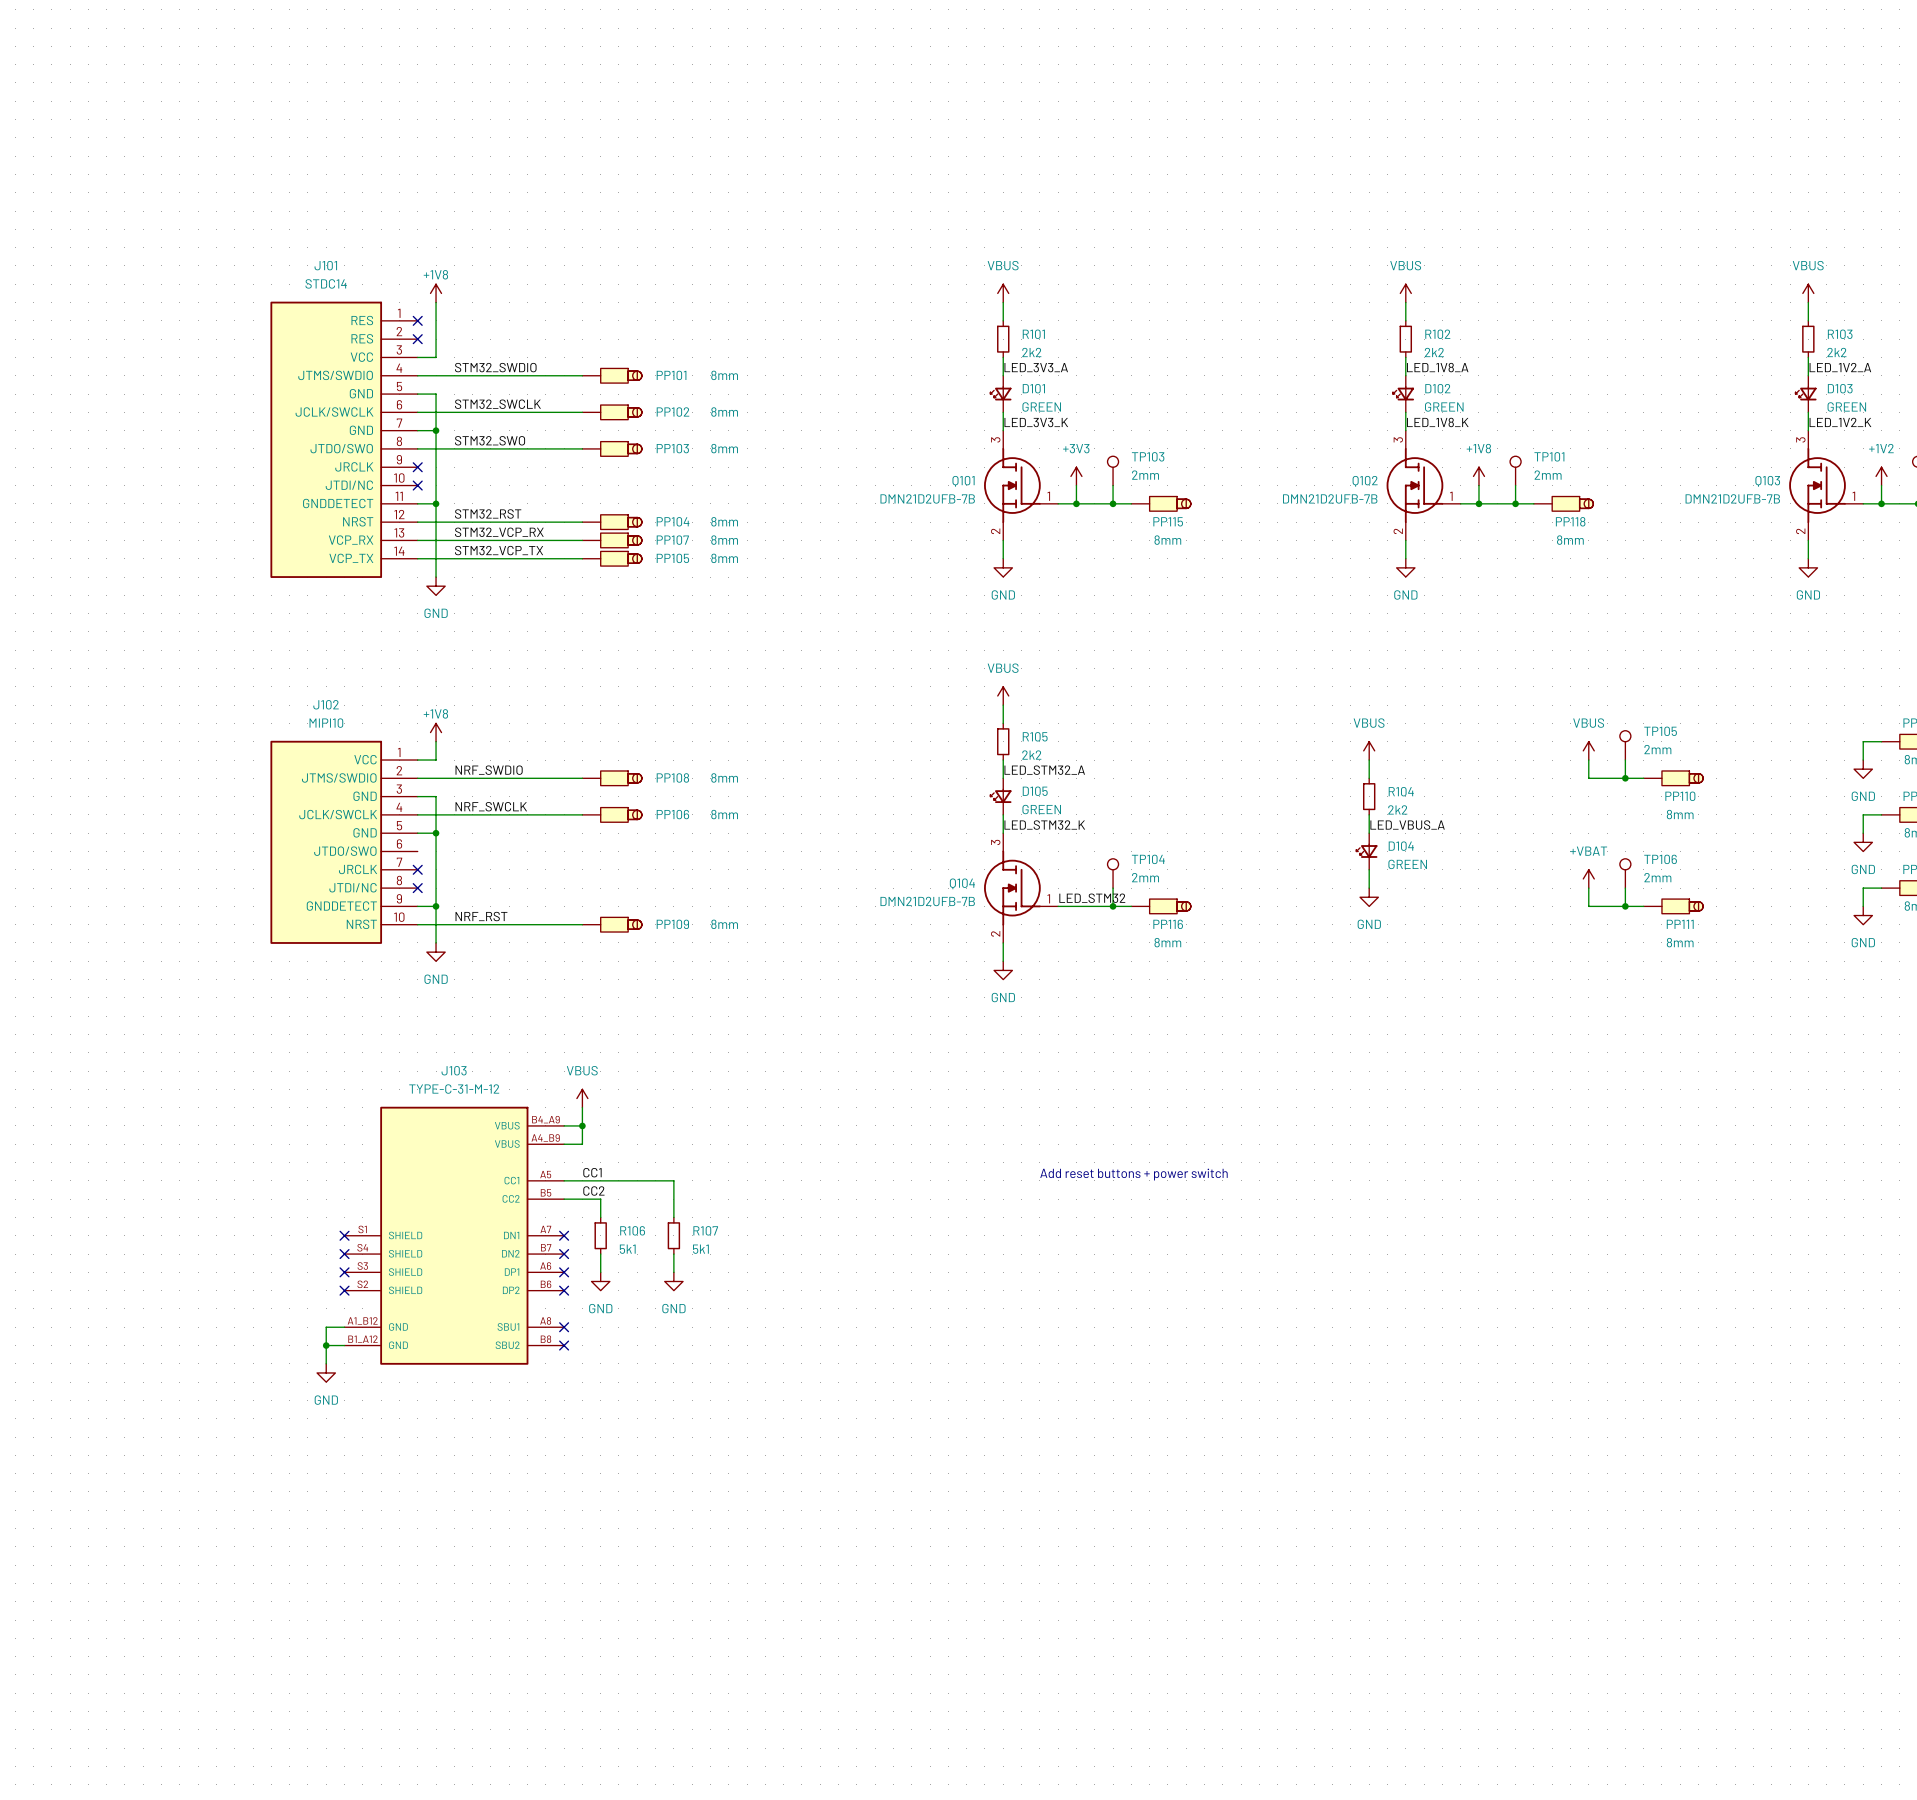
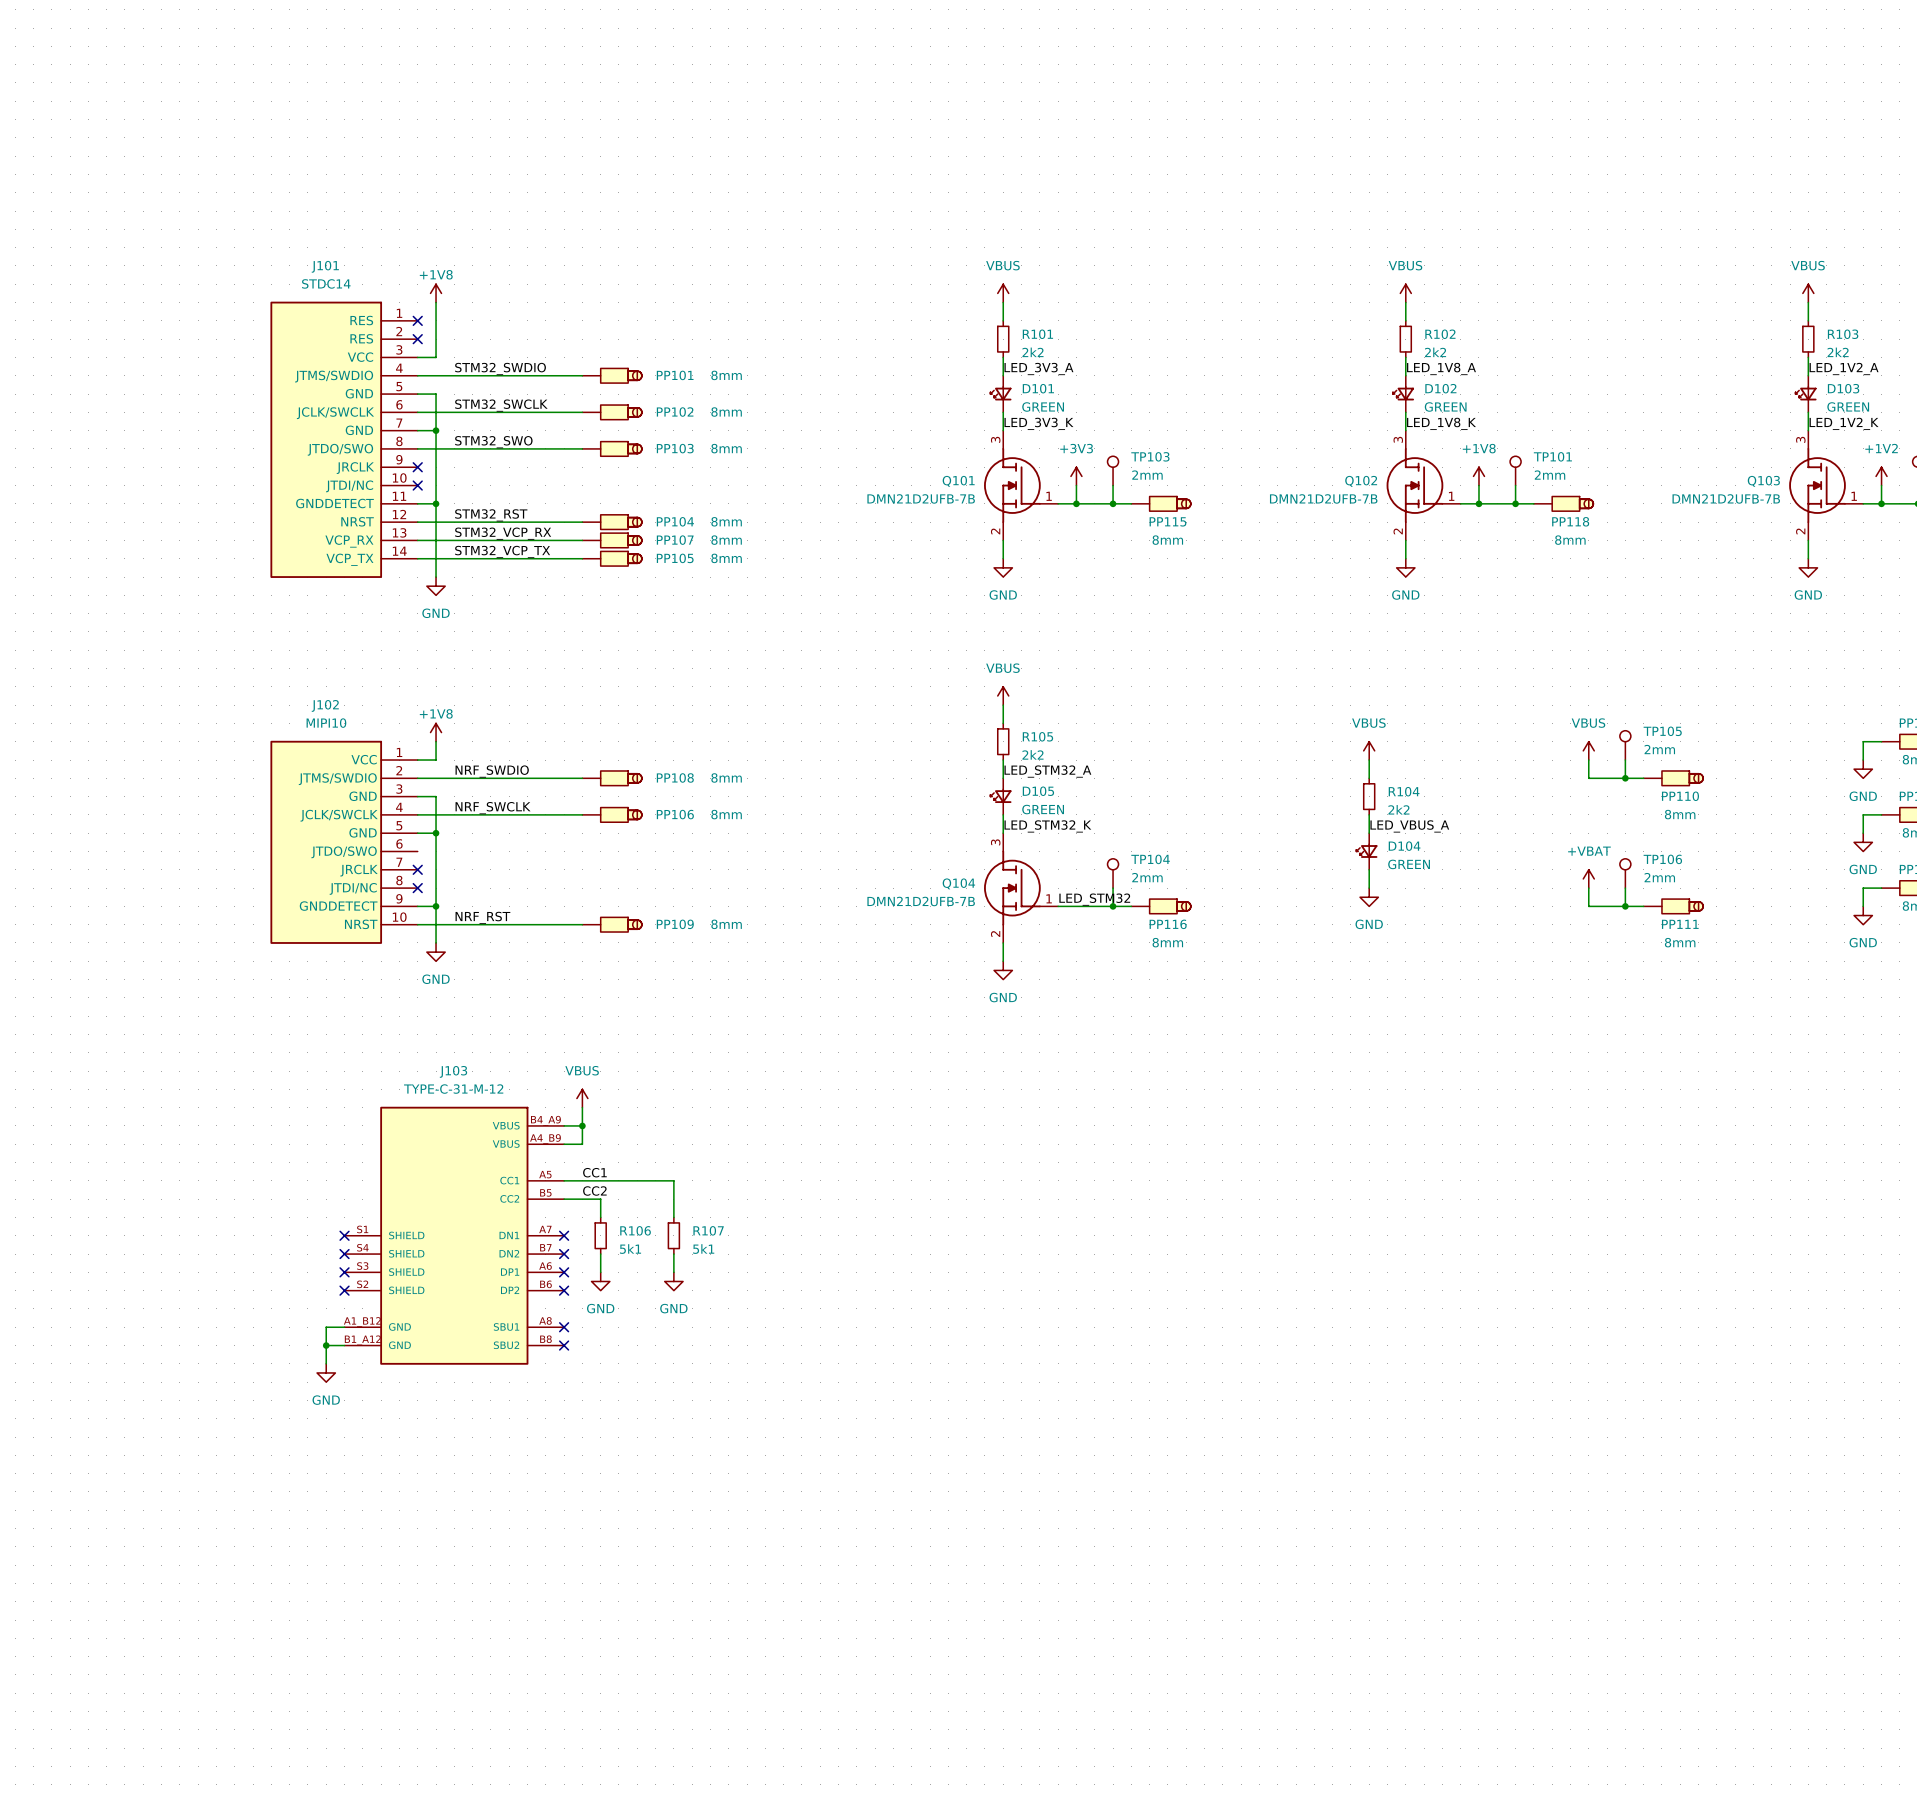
text: Add reset buttons + power switch (1133, 1174) -> none

